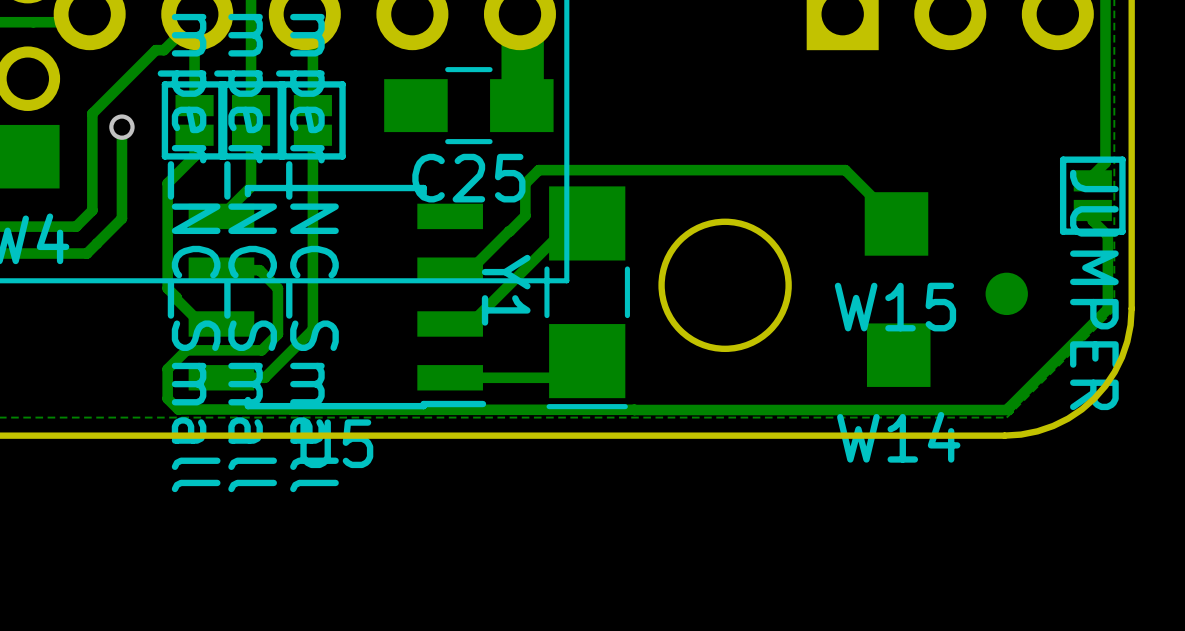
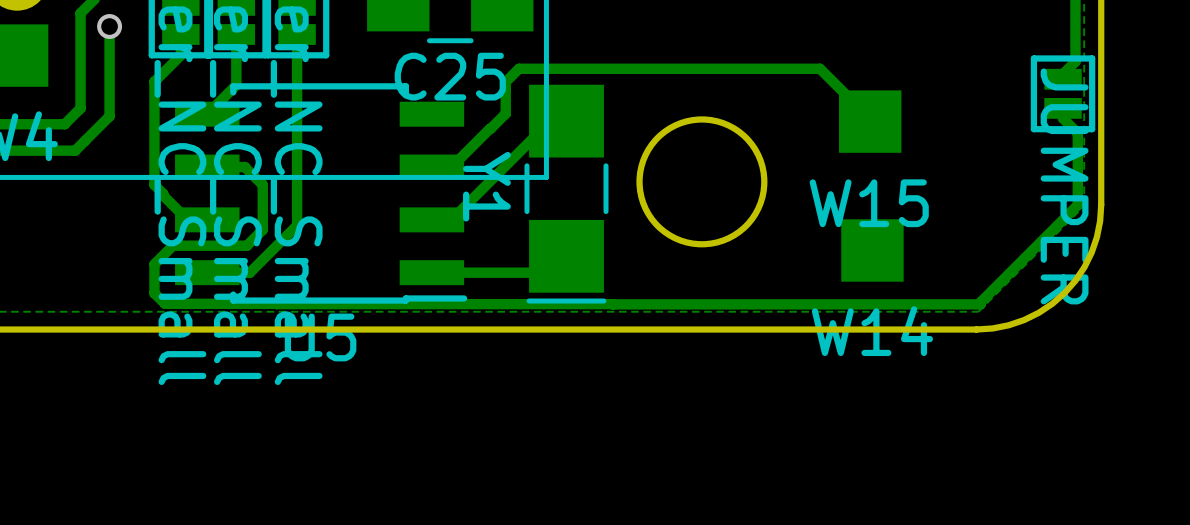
part: (1006, 293) -> none

